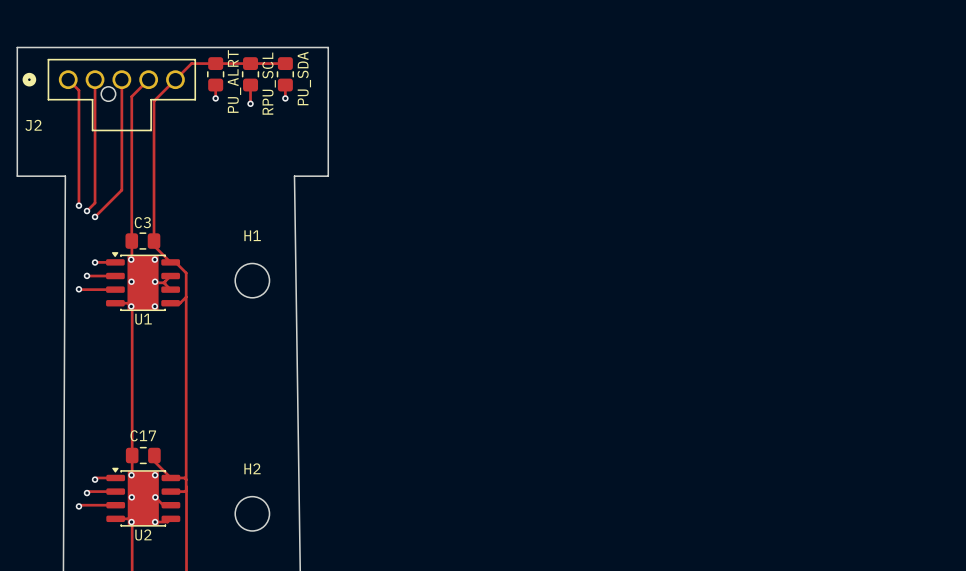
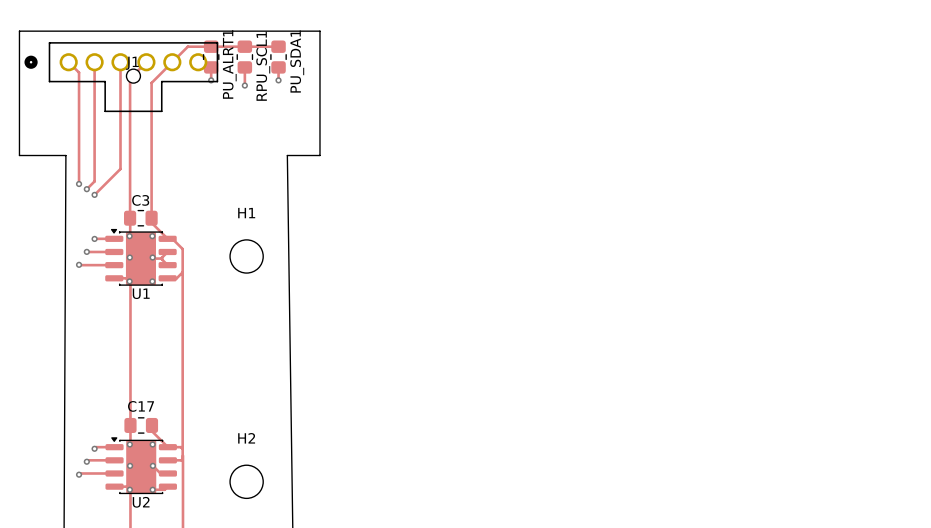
PU_SDA name: PU_SDA (304, 78) -> PU_SDA1 (297, 61)
PU_ALRT name: PU_ALRT (234, 81) -> PU_ALRT1 (229, 64)
RPU_SCL name: RPU_SCL (269, 83) -> RPU_SCL1 (263, 66)
J2: (109, 95) -> none
J1: none -> (121, 77)

